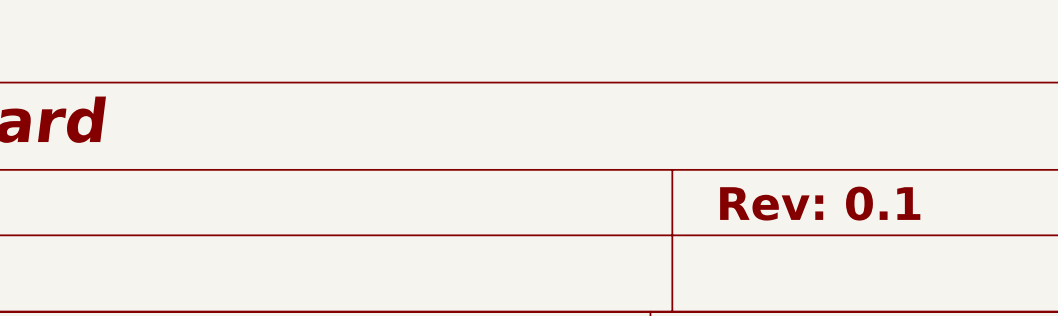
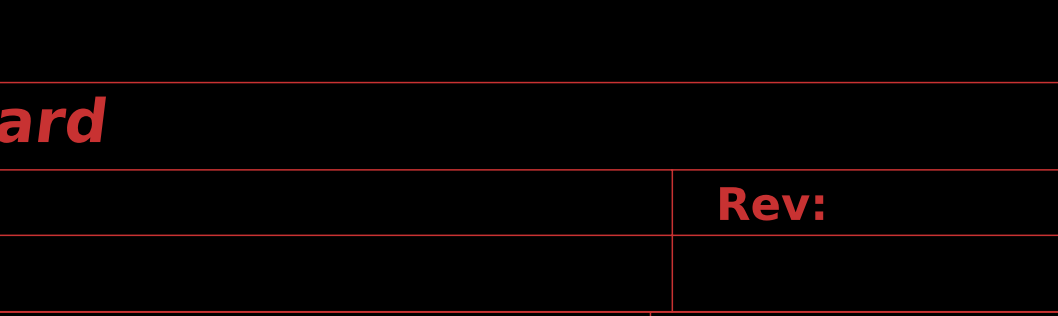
title block: Rev: 0.1 (820, 203) -> Rev: (771, 203)

